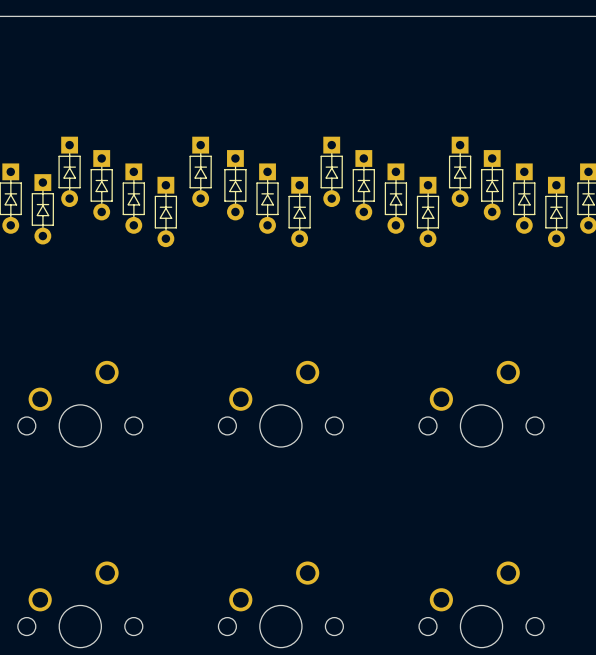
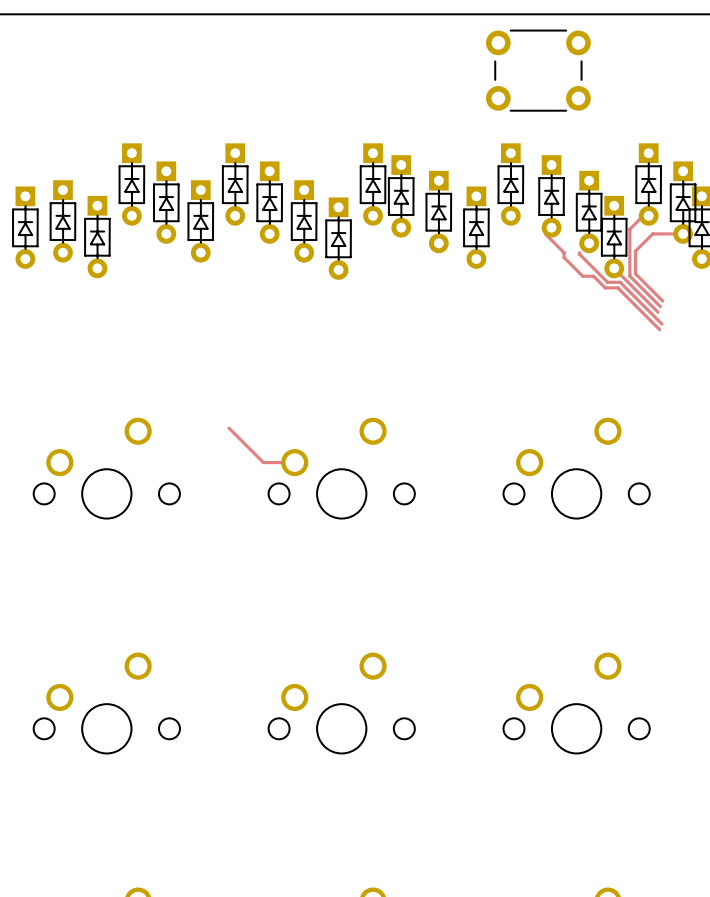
part: none -> (538, 70)
part: none -> (131, 184)
part: none -> (235, 184)
part: none -> (373, 184)
part: none -> (510, 184)
part: none -> (648, 184)
part: (69, 171) -> none
part: (200, 171) -> none
part: none -> (166, 202)
part: none -> (269, 202)
part: none -> (683, 202)
part: (101, 185) -> none
part: (235, 185) -> none
track: none -> (648, 215) (643, 215) (629, 229) (629, 276) (660, 306)
part: none -> (62, 221)
part: none -> (200, 221)
part: none -> (304, 221)
part: (133, 198) -> none
part: (267, 198) -> none
part position: (524, 198) -> (614, 237)
track: none -> (545, 233) (564, 252) (564, 257) (582, 276) (593, 276) (605, 287) (617, 287) (659, 329)
track: none -> (683, 233) (652, 233) (635, 251) (635, 273) (662, 301)
part: none -> (97, 237)
part: none -> (338, 238)
part: (42, 209) -> none
part: (165, 211) -> none
part: (299, 211) -> none
part: (428, 211) -> none
part: (556, 211) -> none
track: none -> (579, 252) (607, 282) (620, 282) (661, 324)
track: none -> (614, 268) (658, 312)
track: none -> (228, 428) (263, 462) (294, 462)

